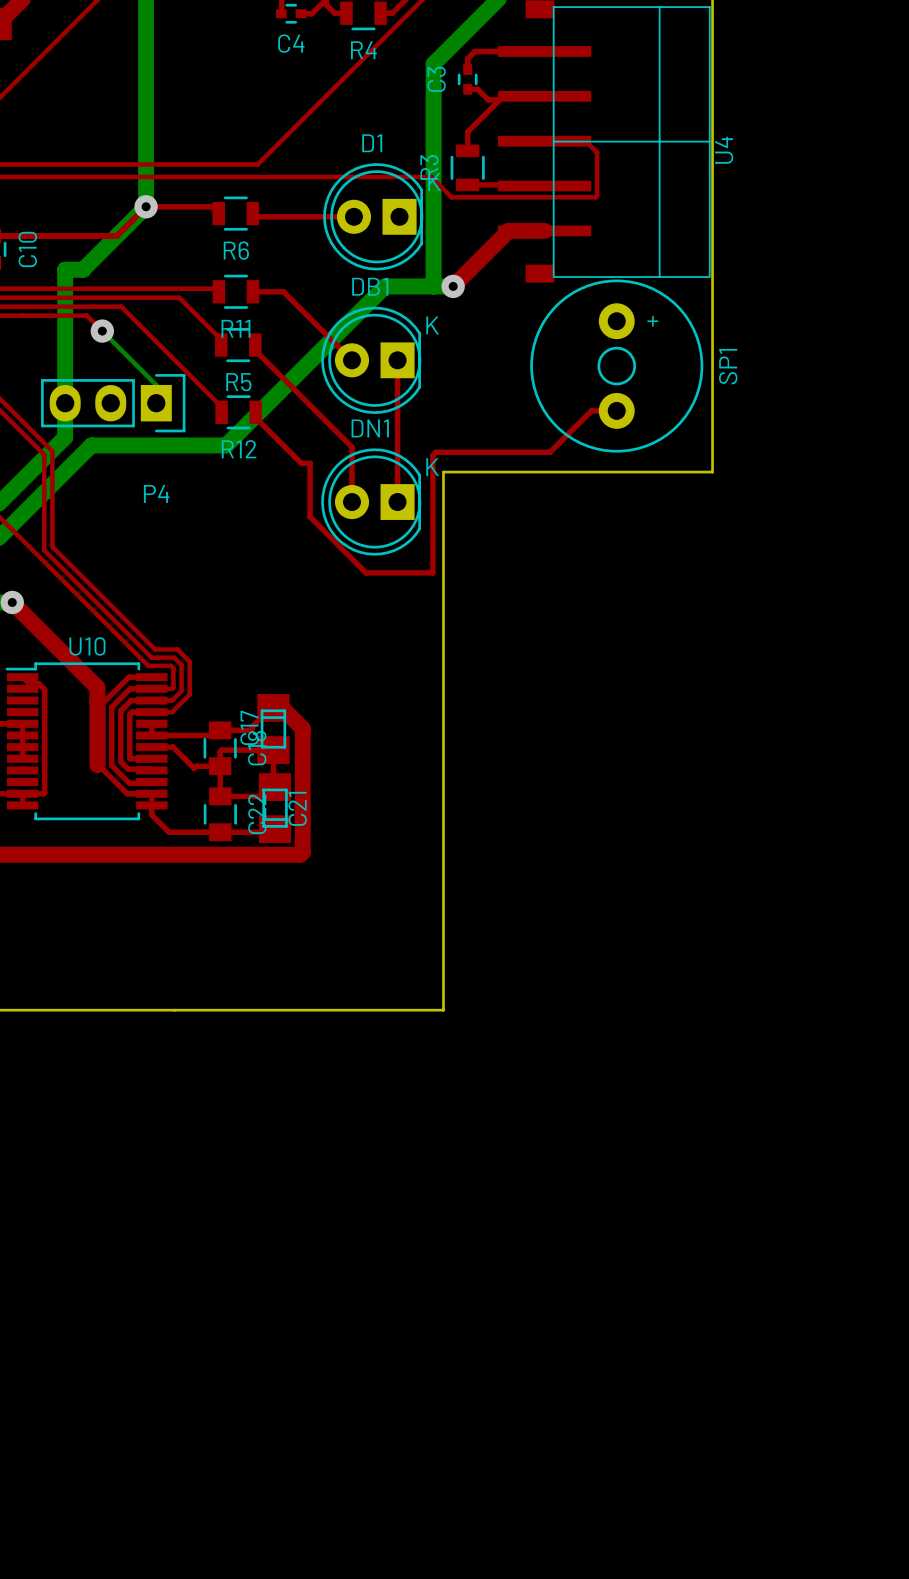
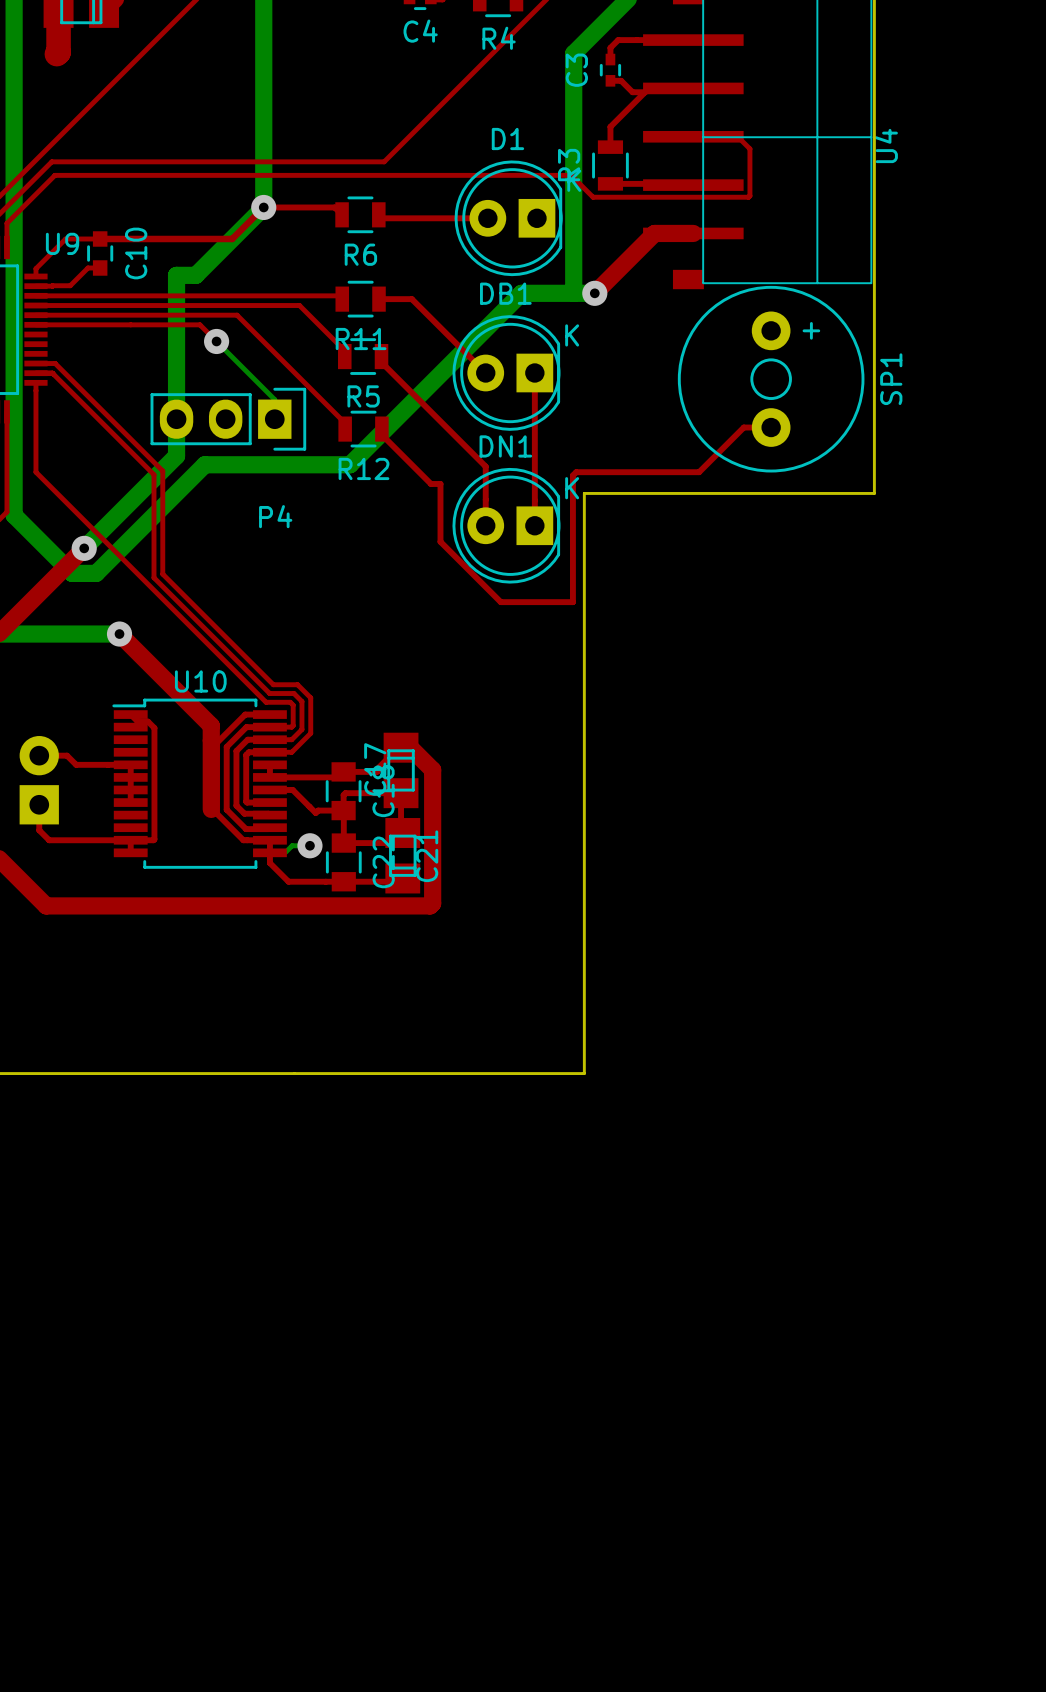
bottom track: none -> (309, 845) (292, 845) (285, 852)
via: none -> (309, 845)

